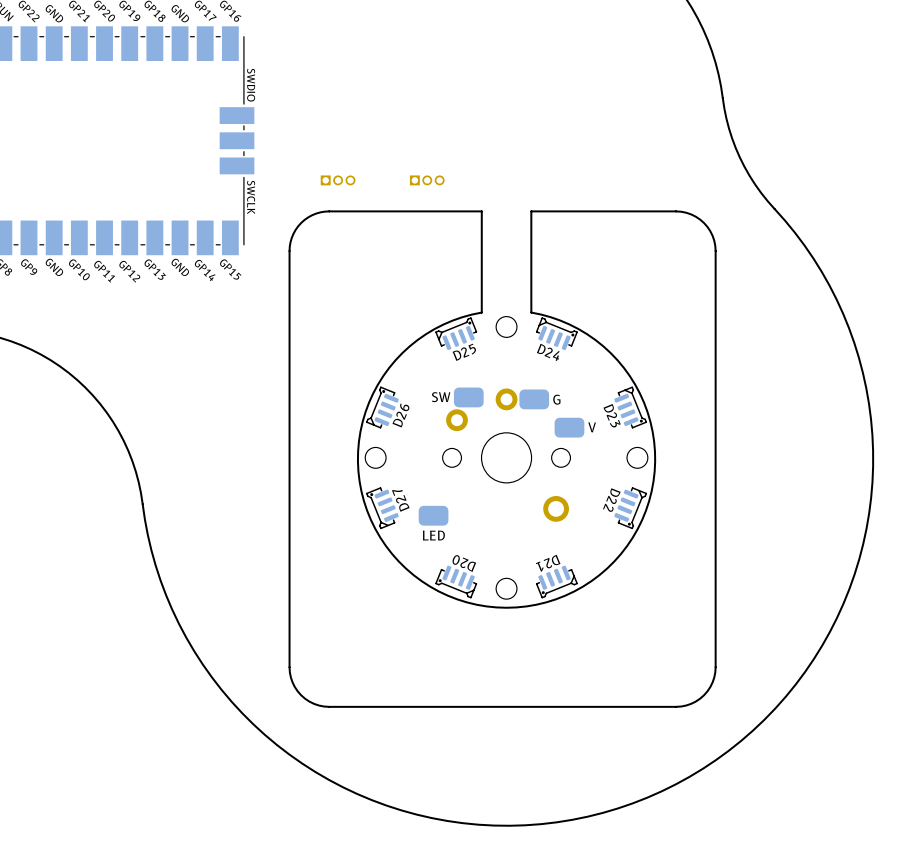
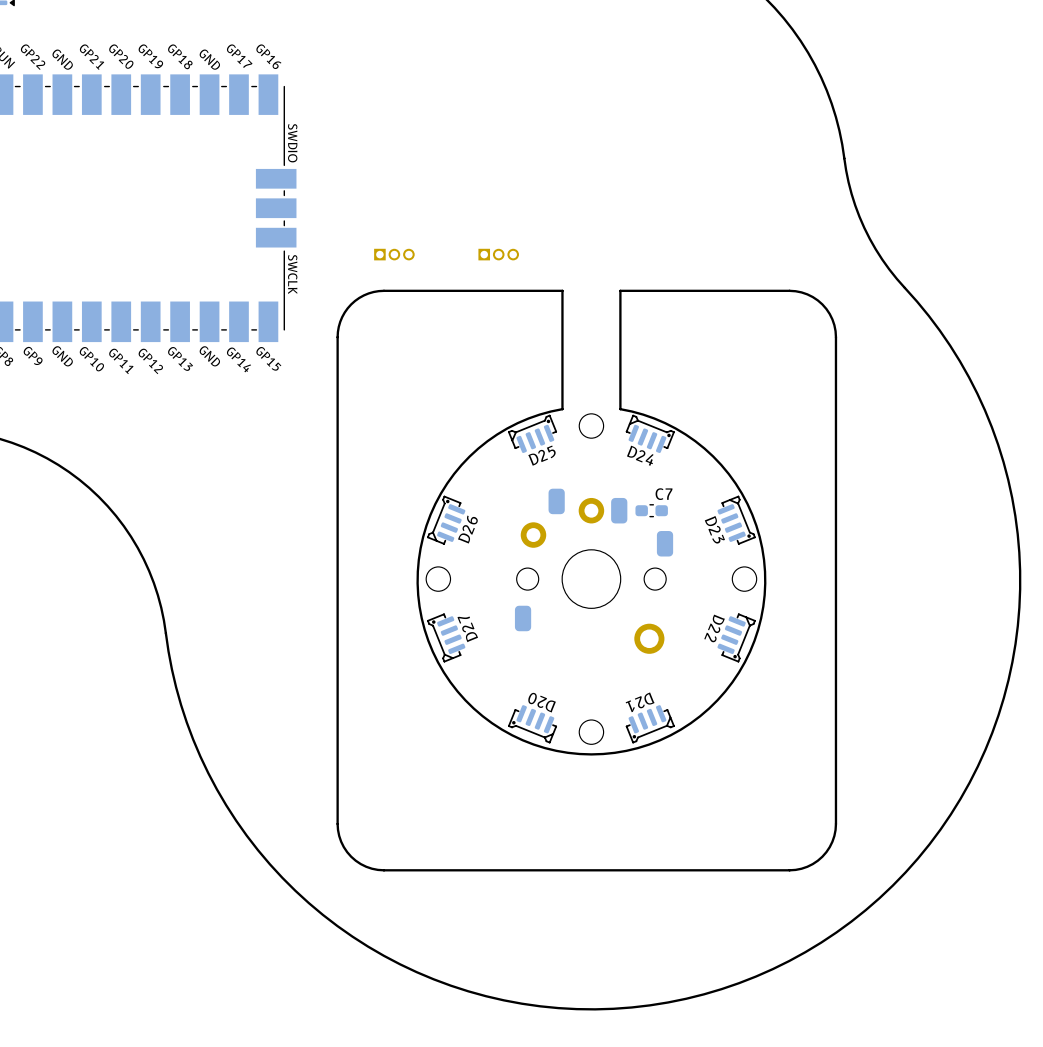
part footprint: [519, 389, 550, 410] -> [611, 497, 628, 524]
part: none -> (556, 501)
part: SW (468, 397) -> none
part value: G (556, 399) -> none
C7: none -> (651, 510)
part footprint: [554, 417, 585, 438] -> [656, 531, 674, 557]
part value: V (592, 427) -> none
part: none -> (523, 618)
part: LED (433, 515) -> none

